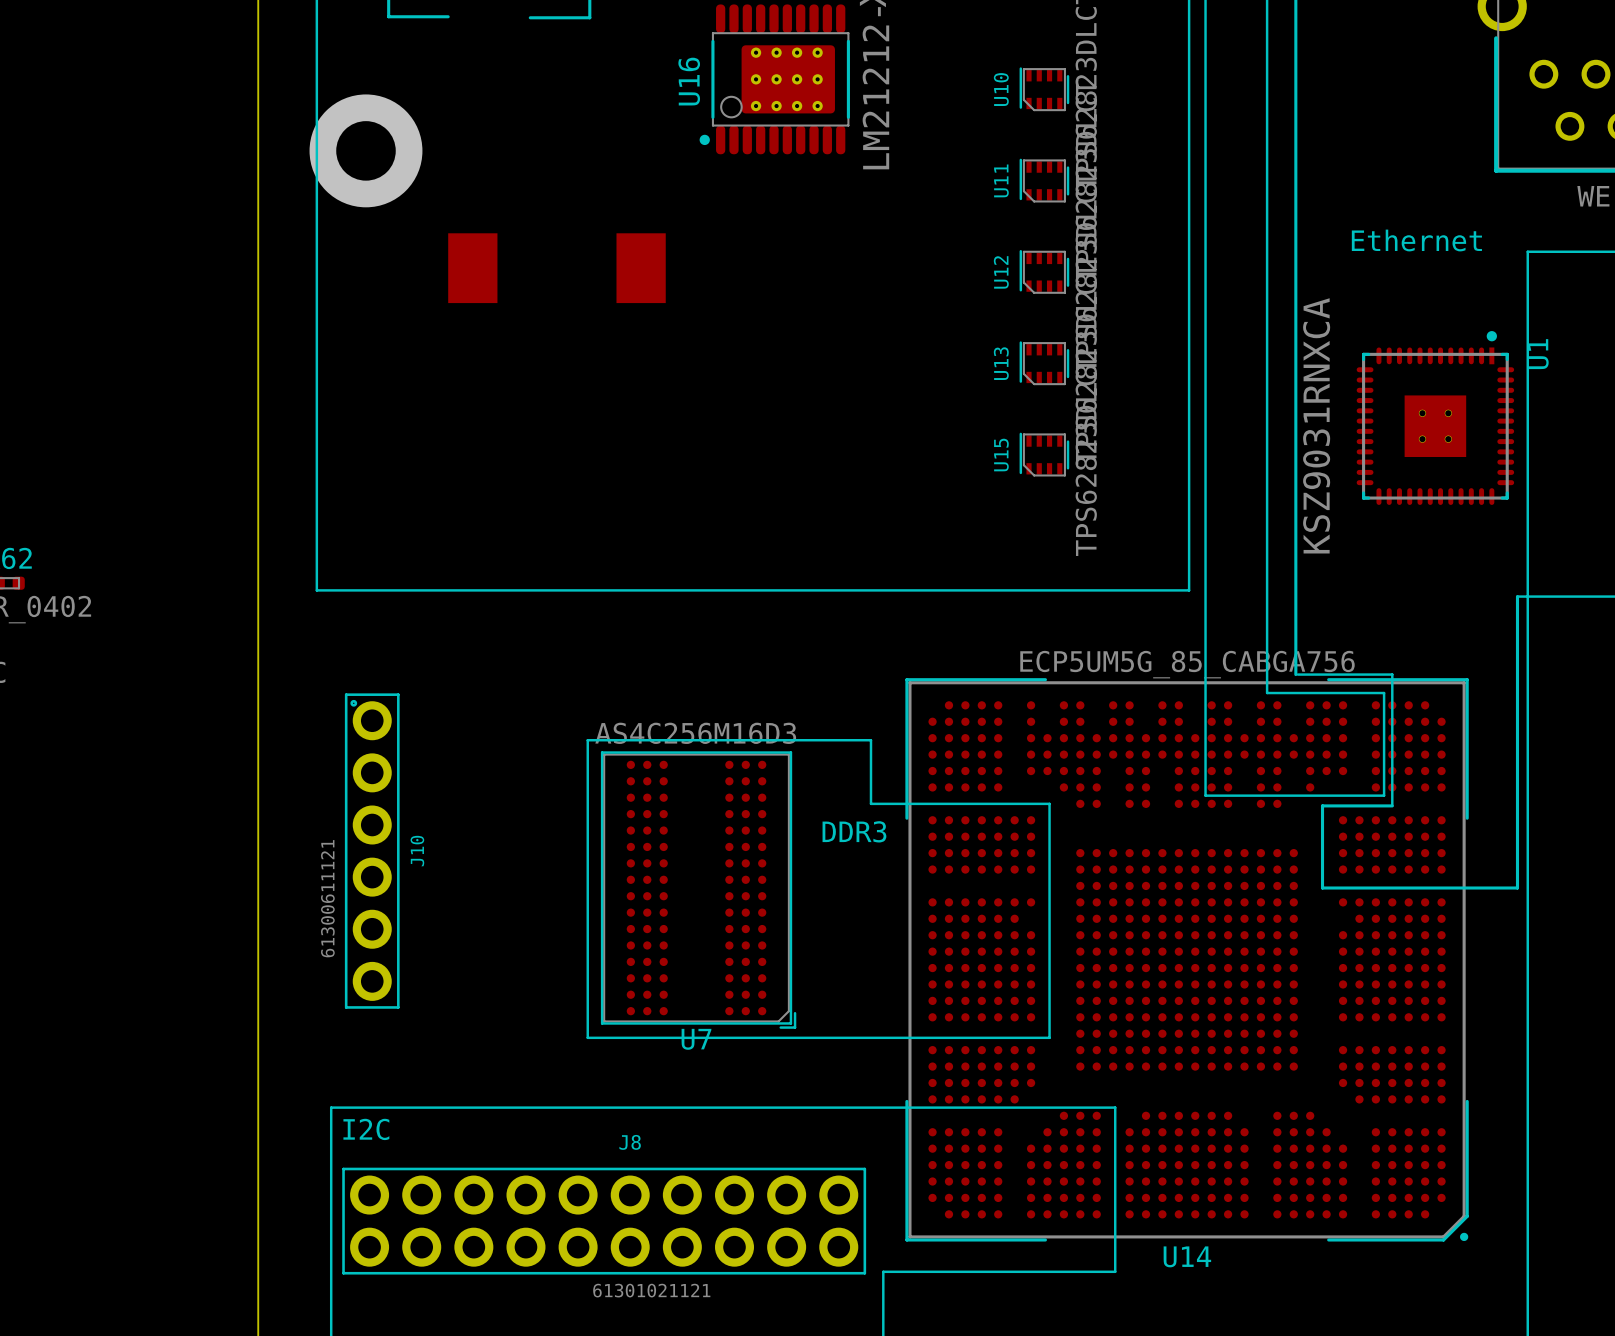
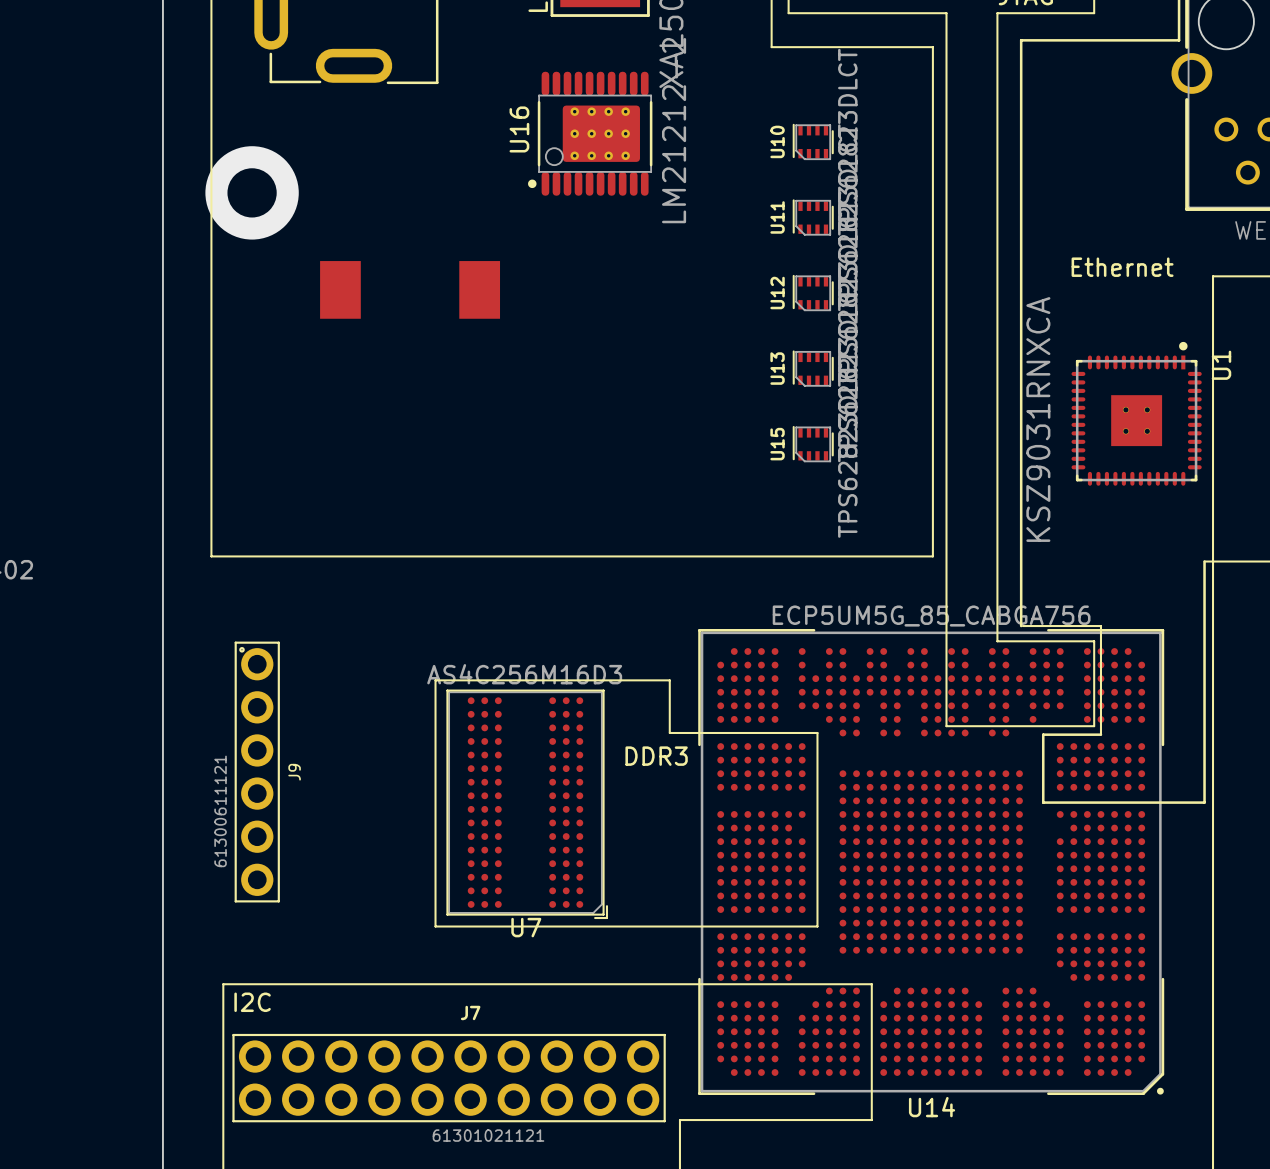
J10 name: J10 (417, 851) -> J9 (294, 772)
J8 name: J8 (630, 1142) -> J7 (470, 1012)

